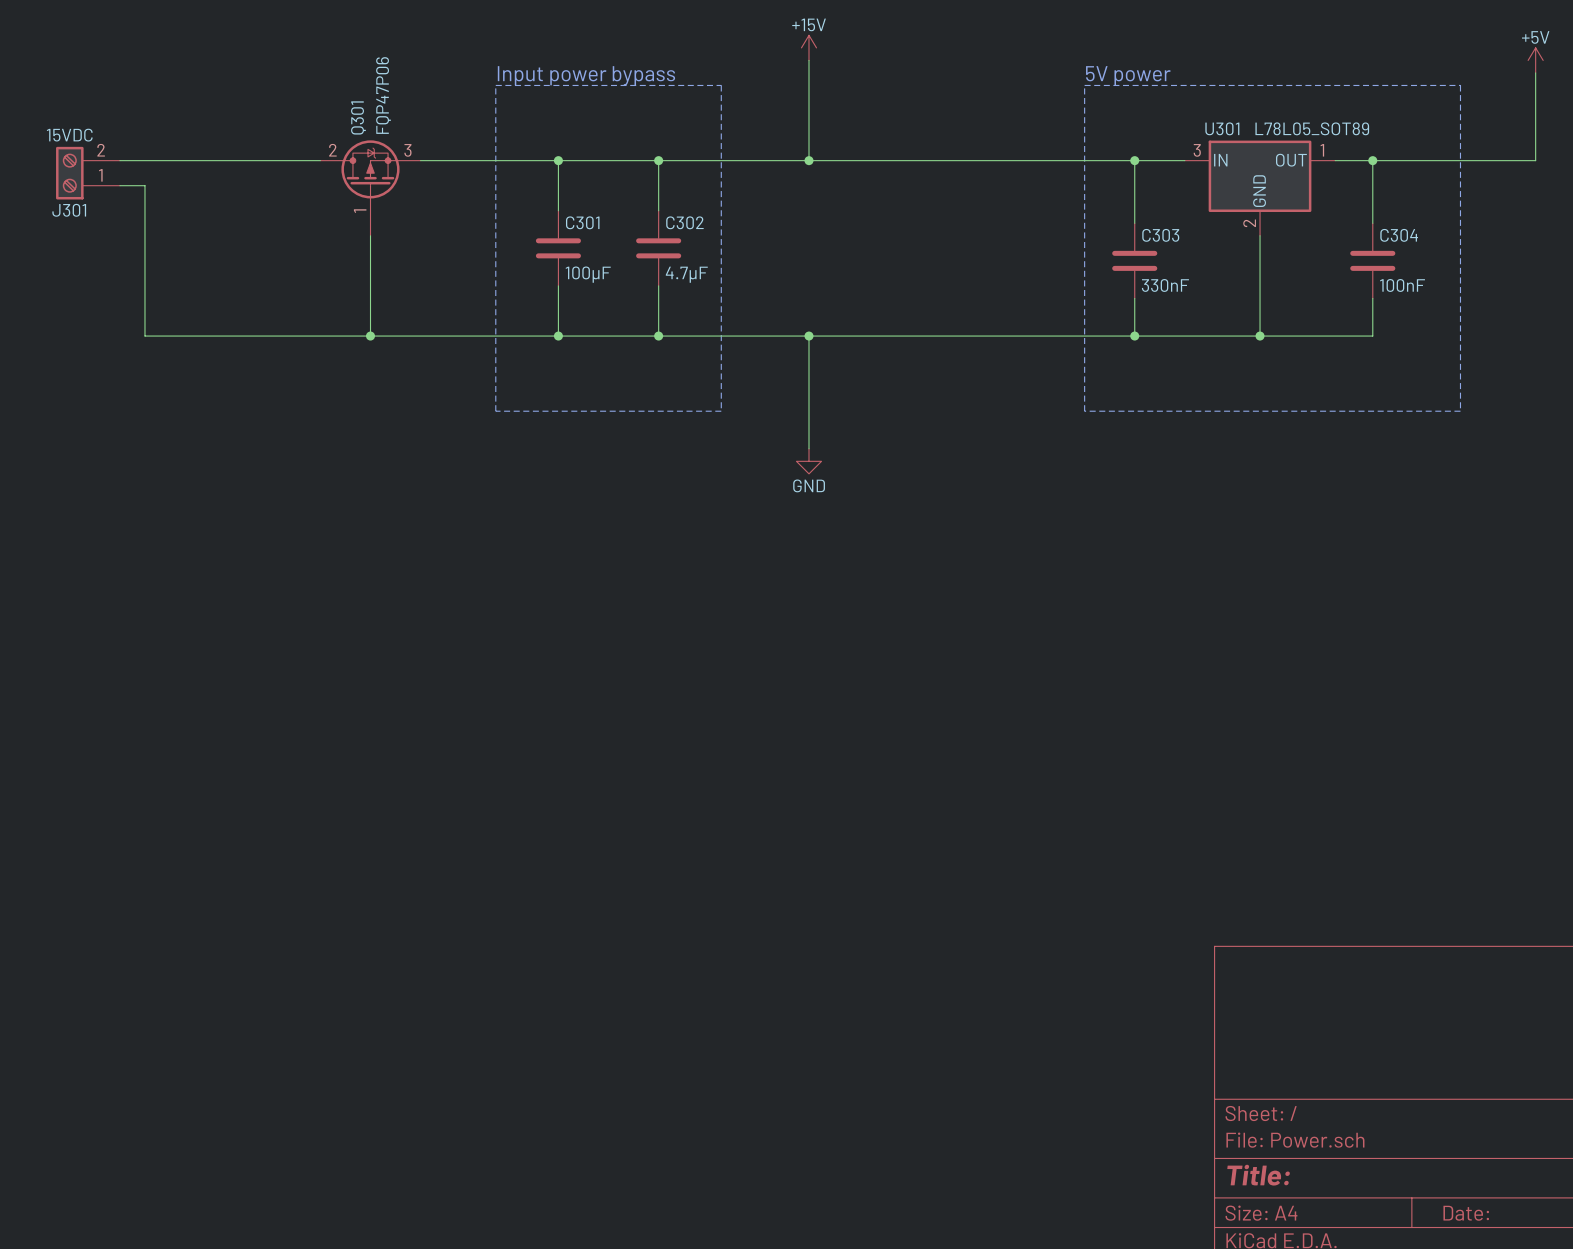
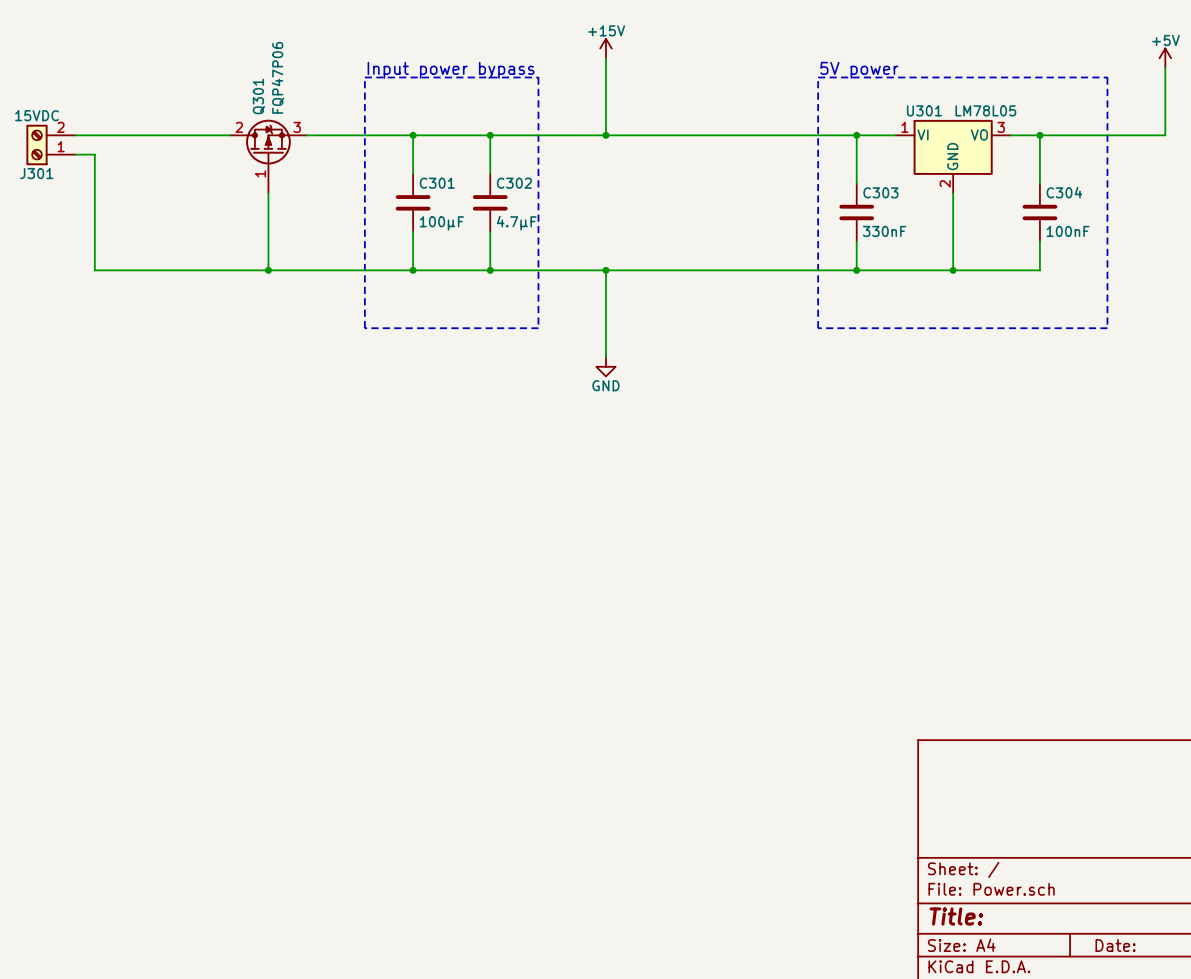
U301 value: L78L05_SOT89 (1312, 128) -> LM78L05 (985, 110)
U301 pin number: 3 (1197, 150) -> 1 (904, 127)
U301 pin number: 1 (1322, 150) -> 3 (1001, 127)
U301 pin name: IN (1220, 160) -> VI (923, 134)
U301 pin name: OUT (1291, 160) -> VO (979, 134)

